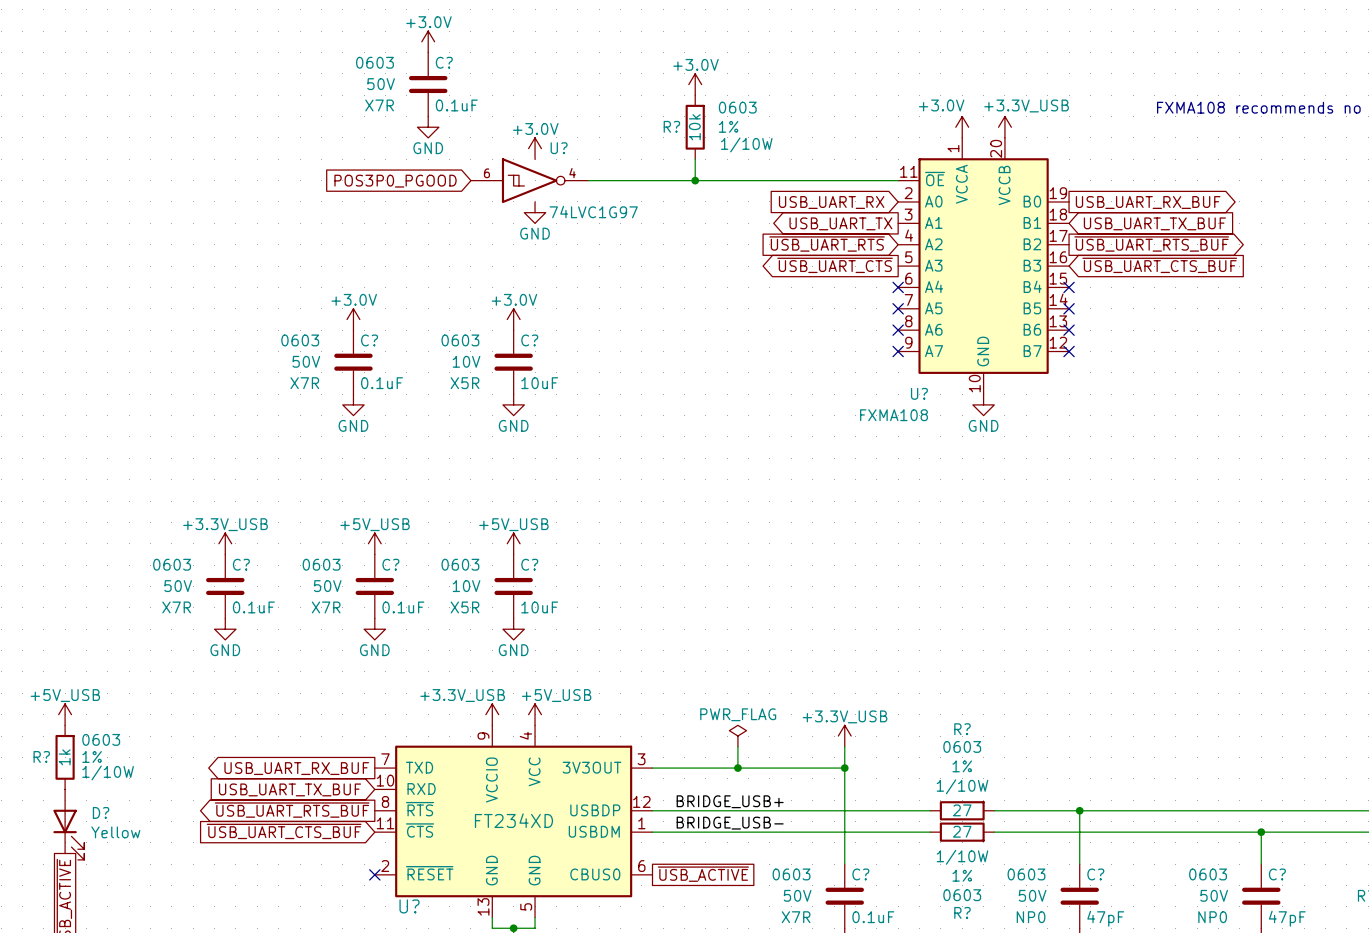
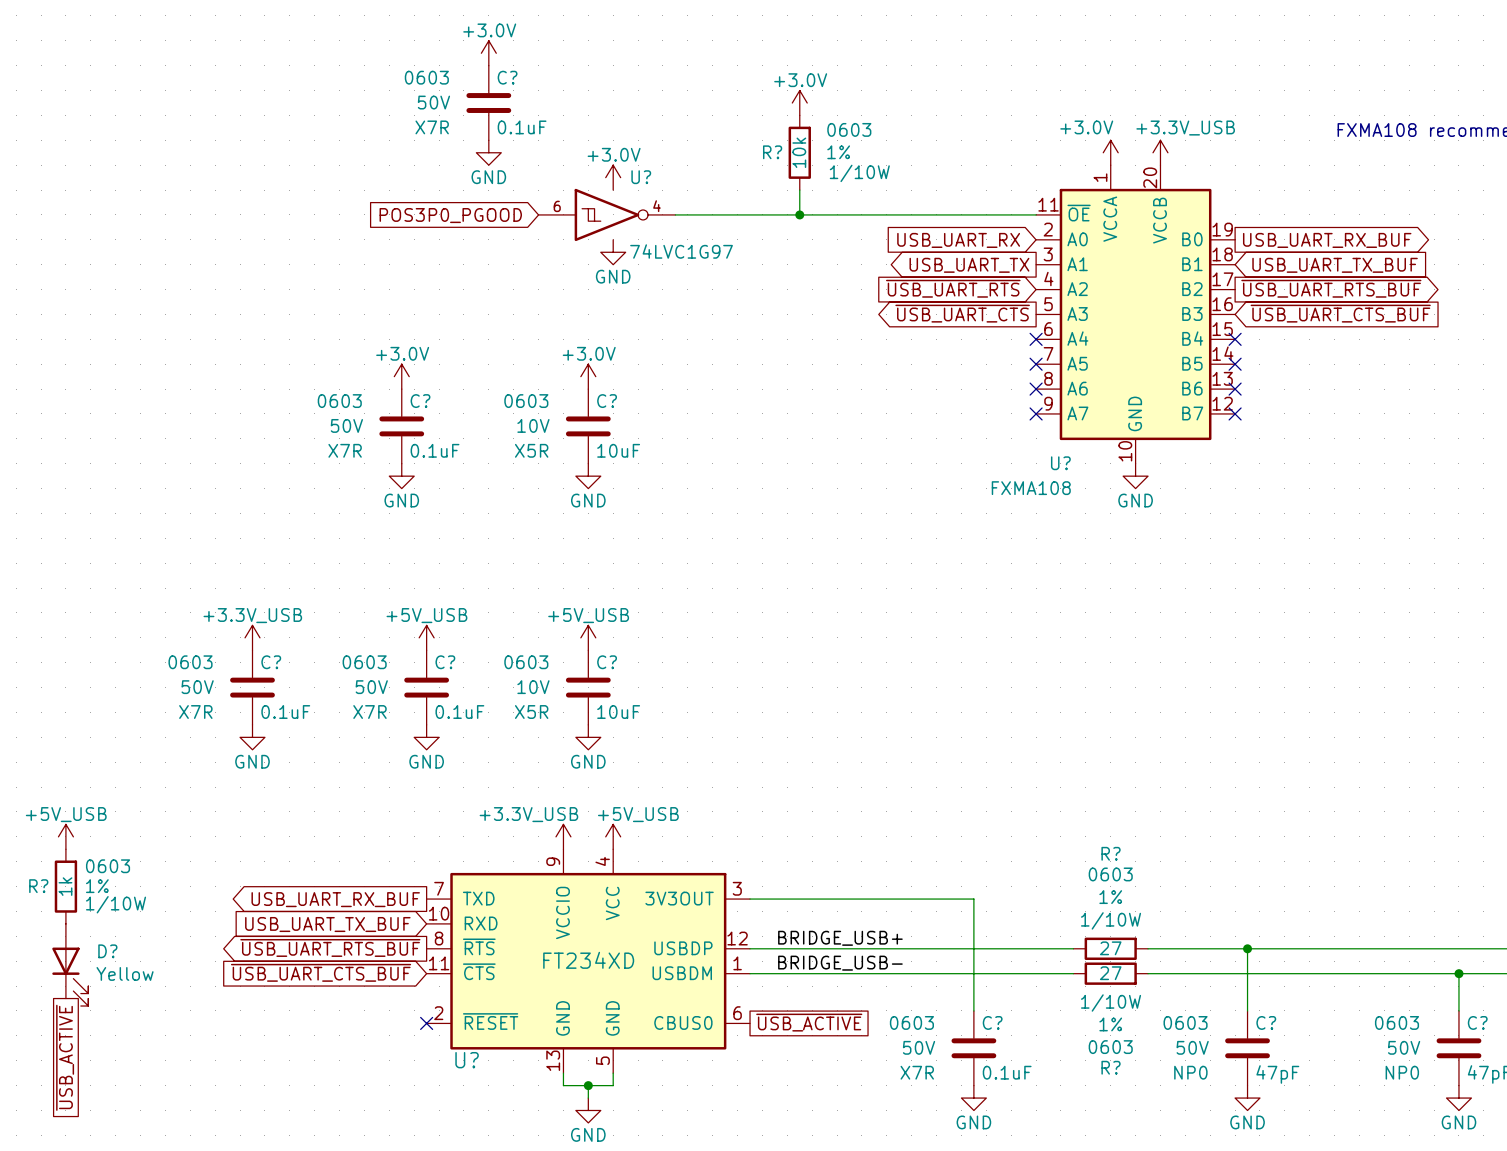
power symbol: PWR_FLAG (737, 736) -> none
power symbol: +3.3V_USB (844, 736) -> none
wire: (737, 746) (737, 768) -> none
wire: (844, 746) (844, 768) -> none
junction: (737, 768) -> none
junction: (844, 768) -> none

